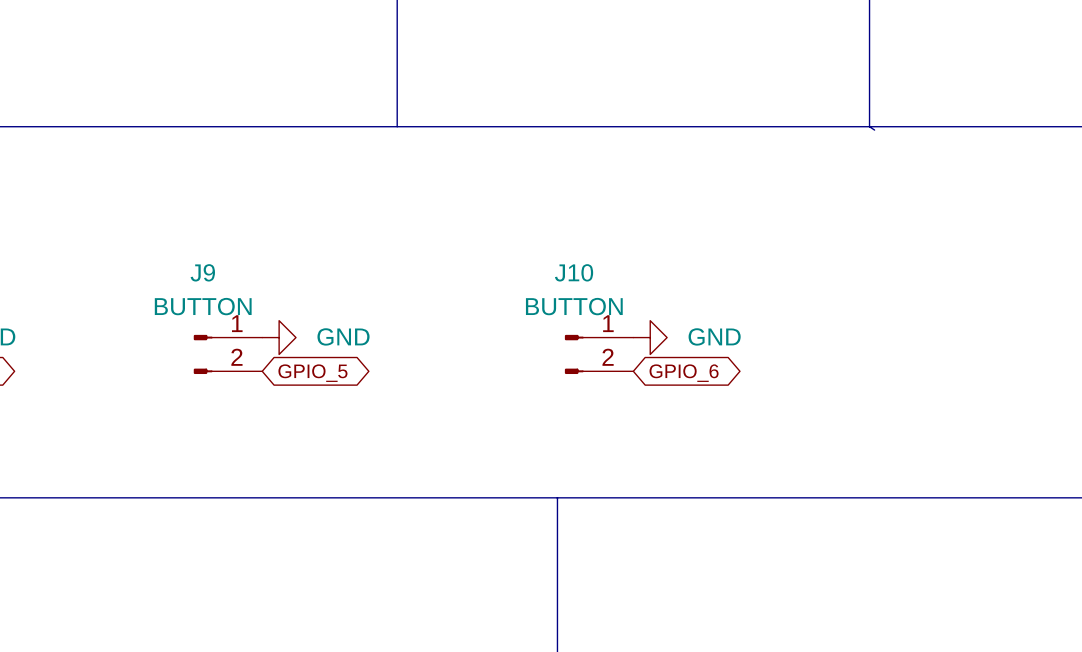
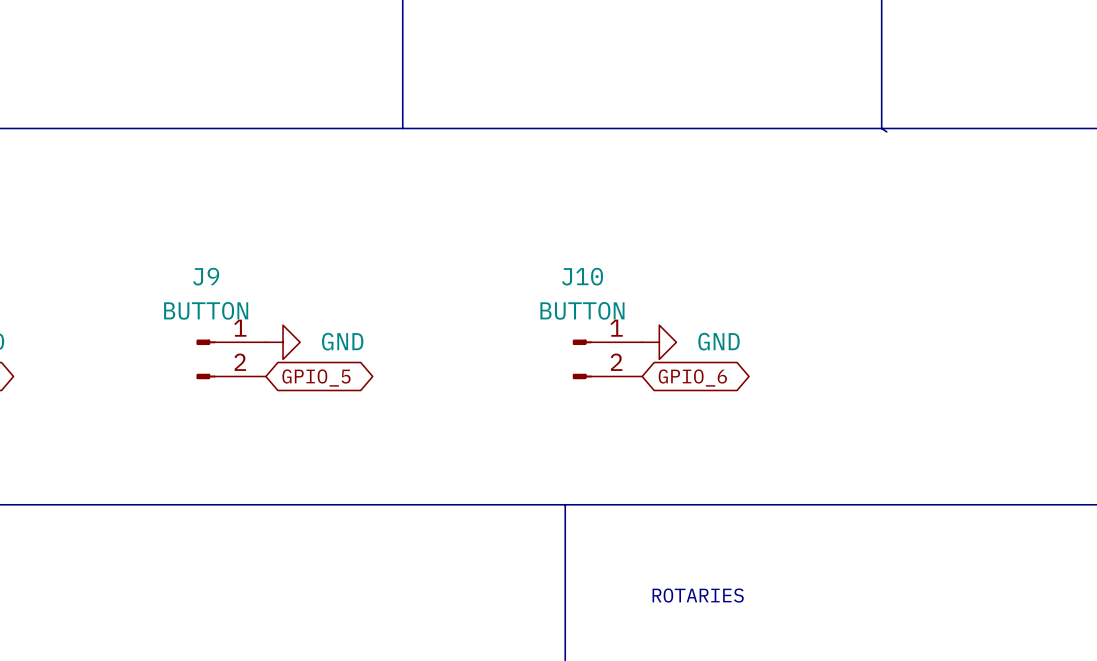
text: none -> ROTARIES (698, 595)

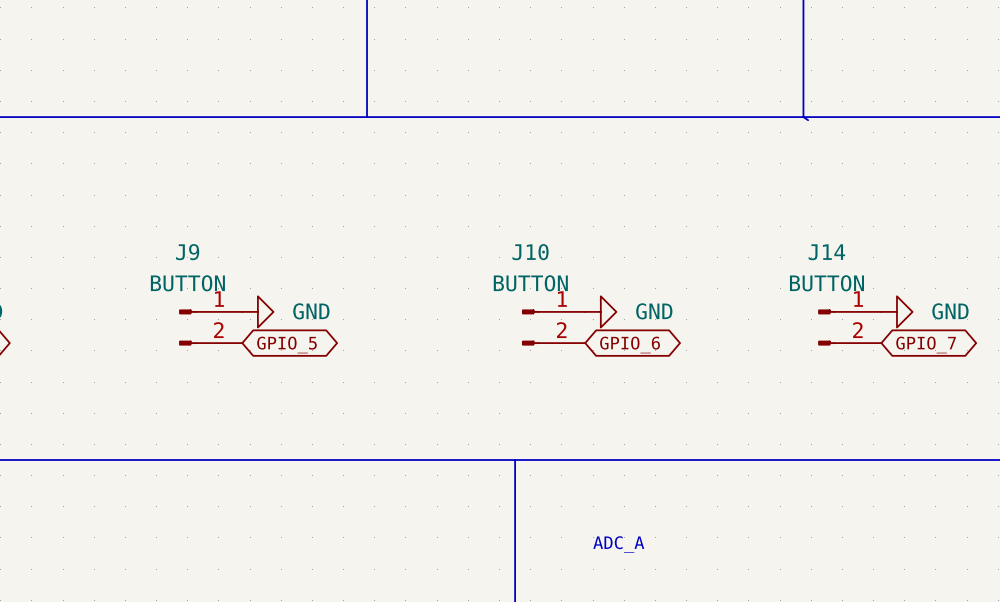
power symbol: none -> GND (896, 311)
J14: none -> BUTTON (849, 327)
global label: none -> GPIO_7 (926, 345)
text: ROTARIES (698, 595) -> ADC_A (618, 544)

